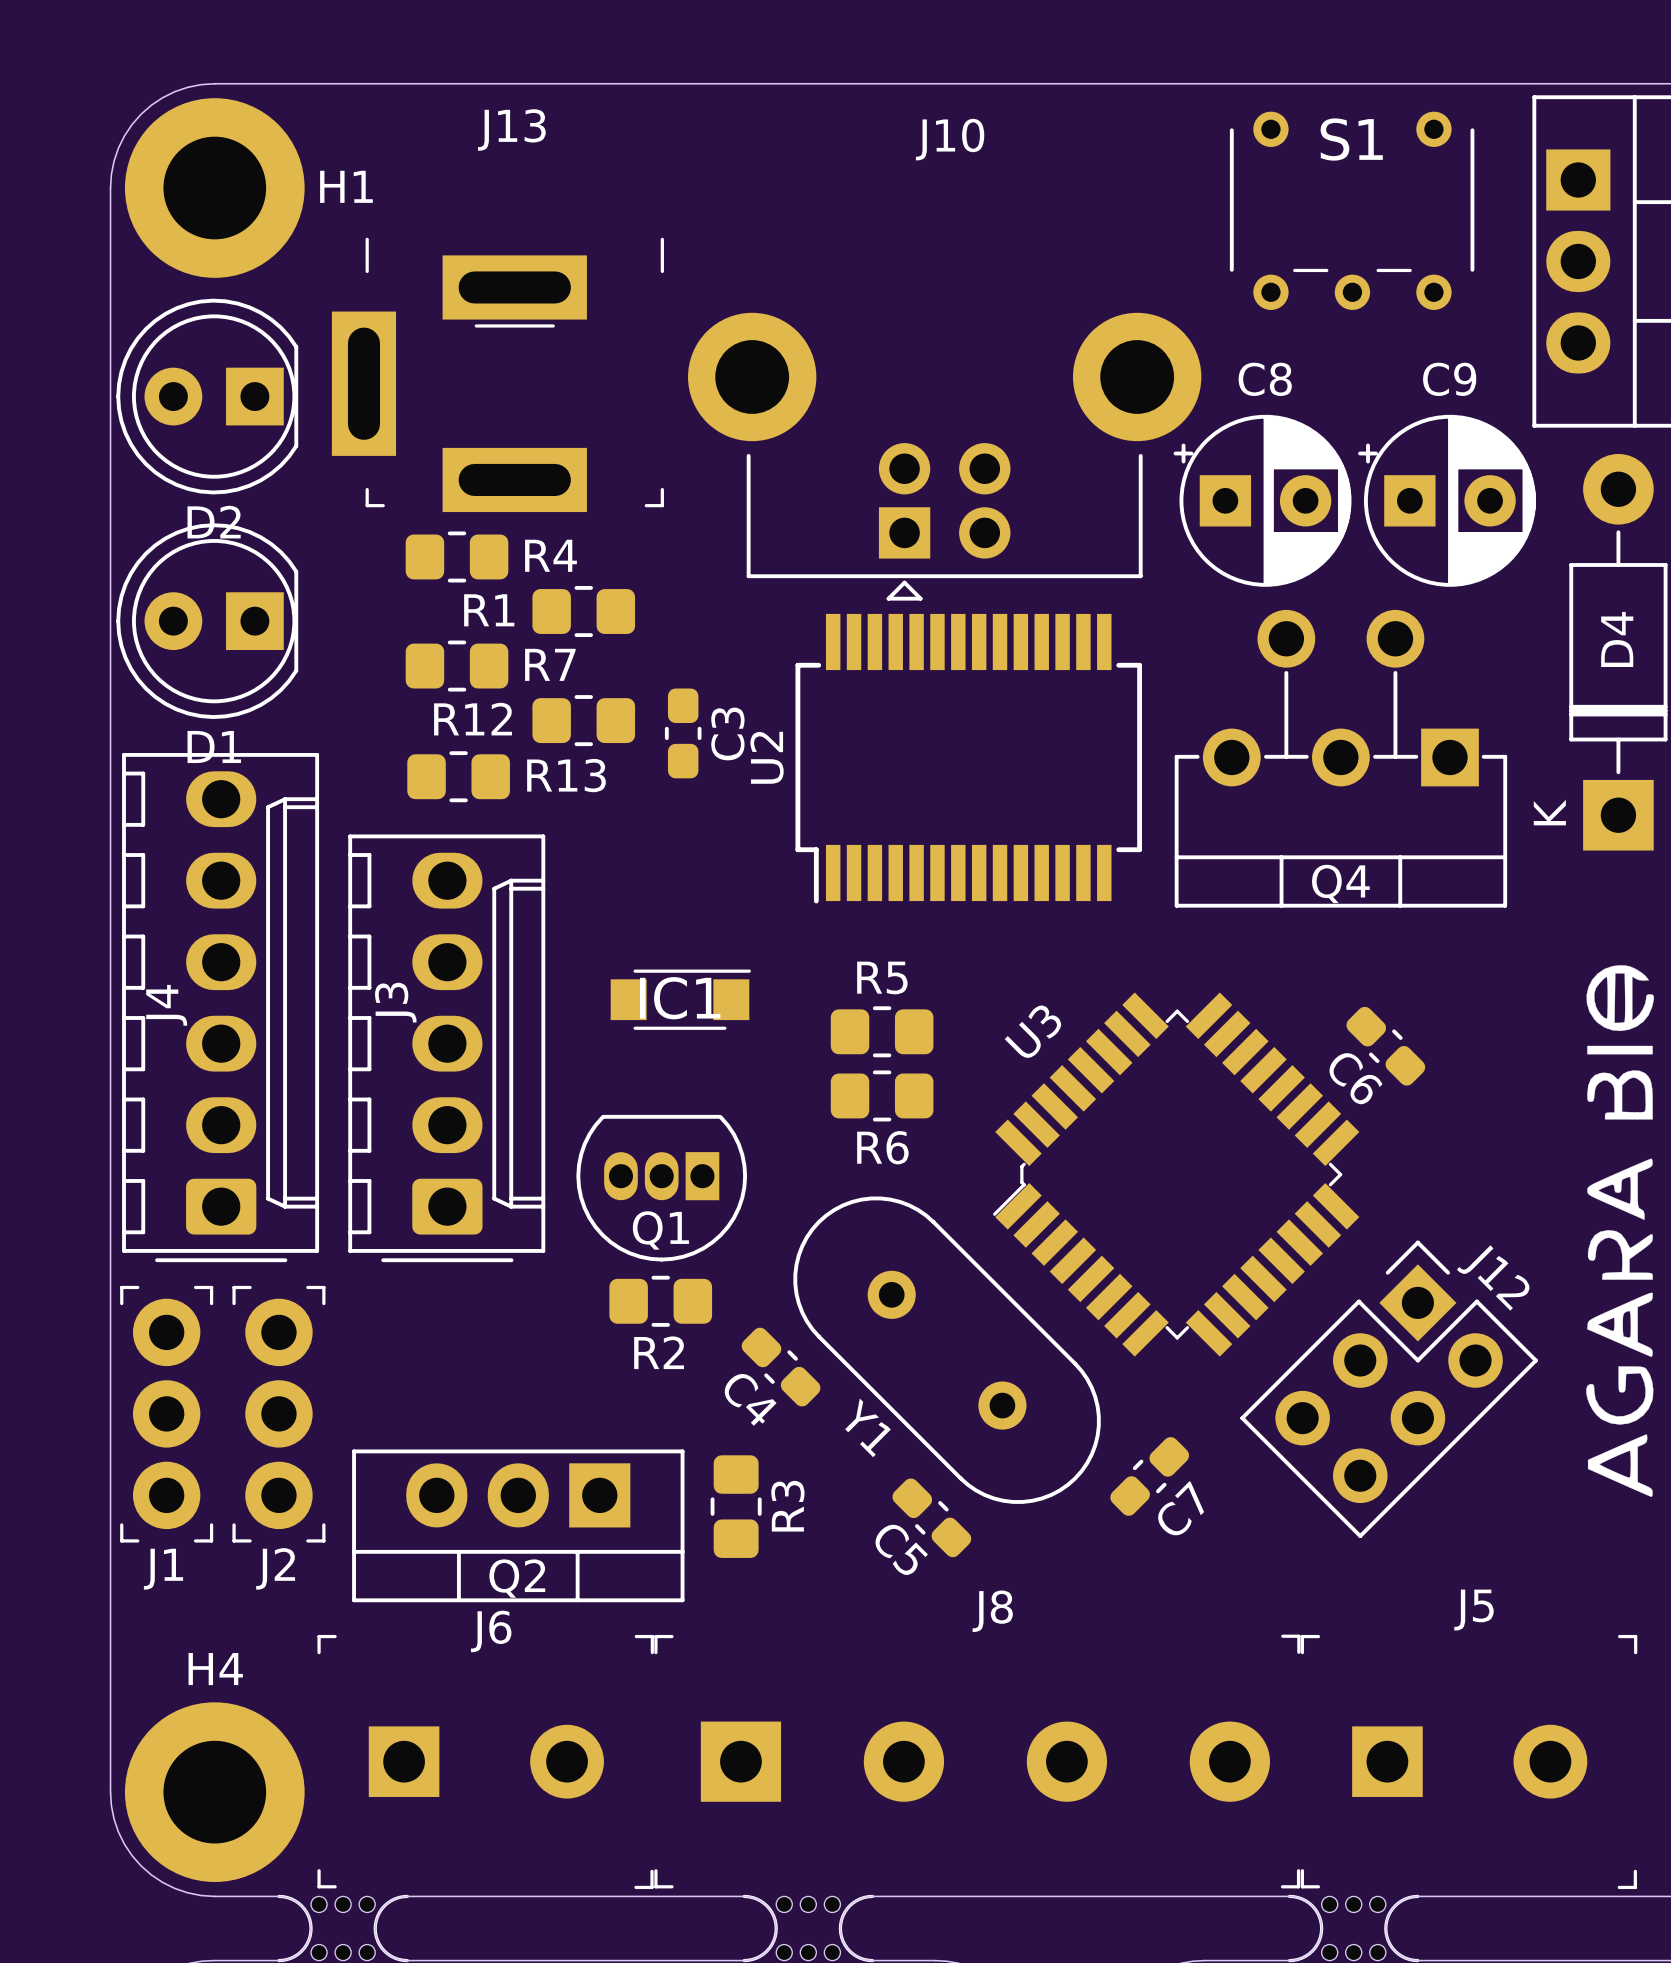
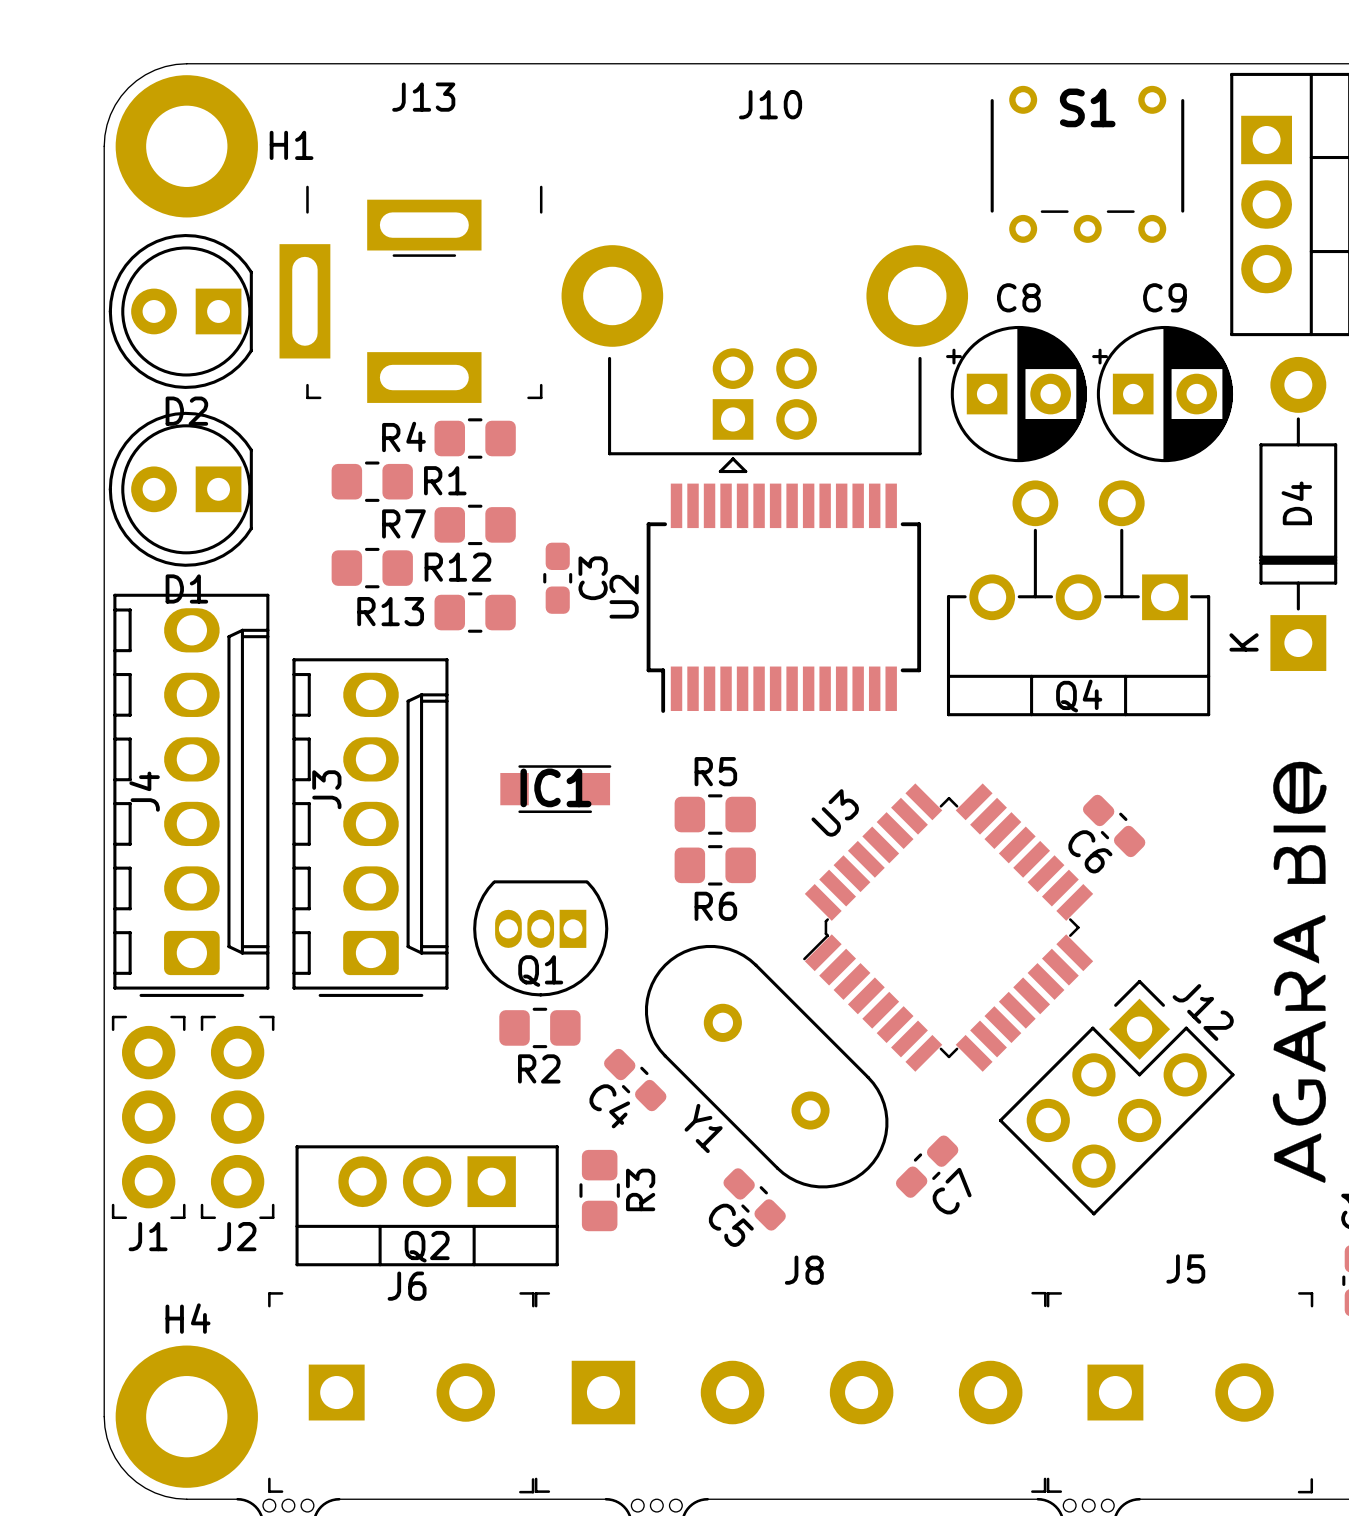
R4 name position: R4 (550, 555) -> R4 (403, 436)
R4 position: (457, 556) -> (475, 438)
R1 name position: R1 (489, 610) -> R1 (445, 480)
R1 position: (583, 611) -> (372, 481)
R7 name position: R7 (550, 664) -> R7 (403, 523)
R7 position: (457, 666) -> (475, 524)
R12 name position: R12 (473, 719) -> R12 (457, 567)
R12 position: (583, 720) -> (372, 568)
R13 name position: R13 (566, 775) -> R13 (390, 611)
R13 position: (458, 776) -> (475, 612)

